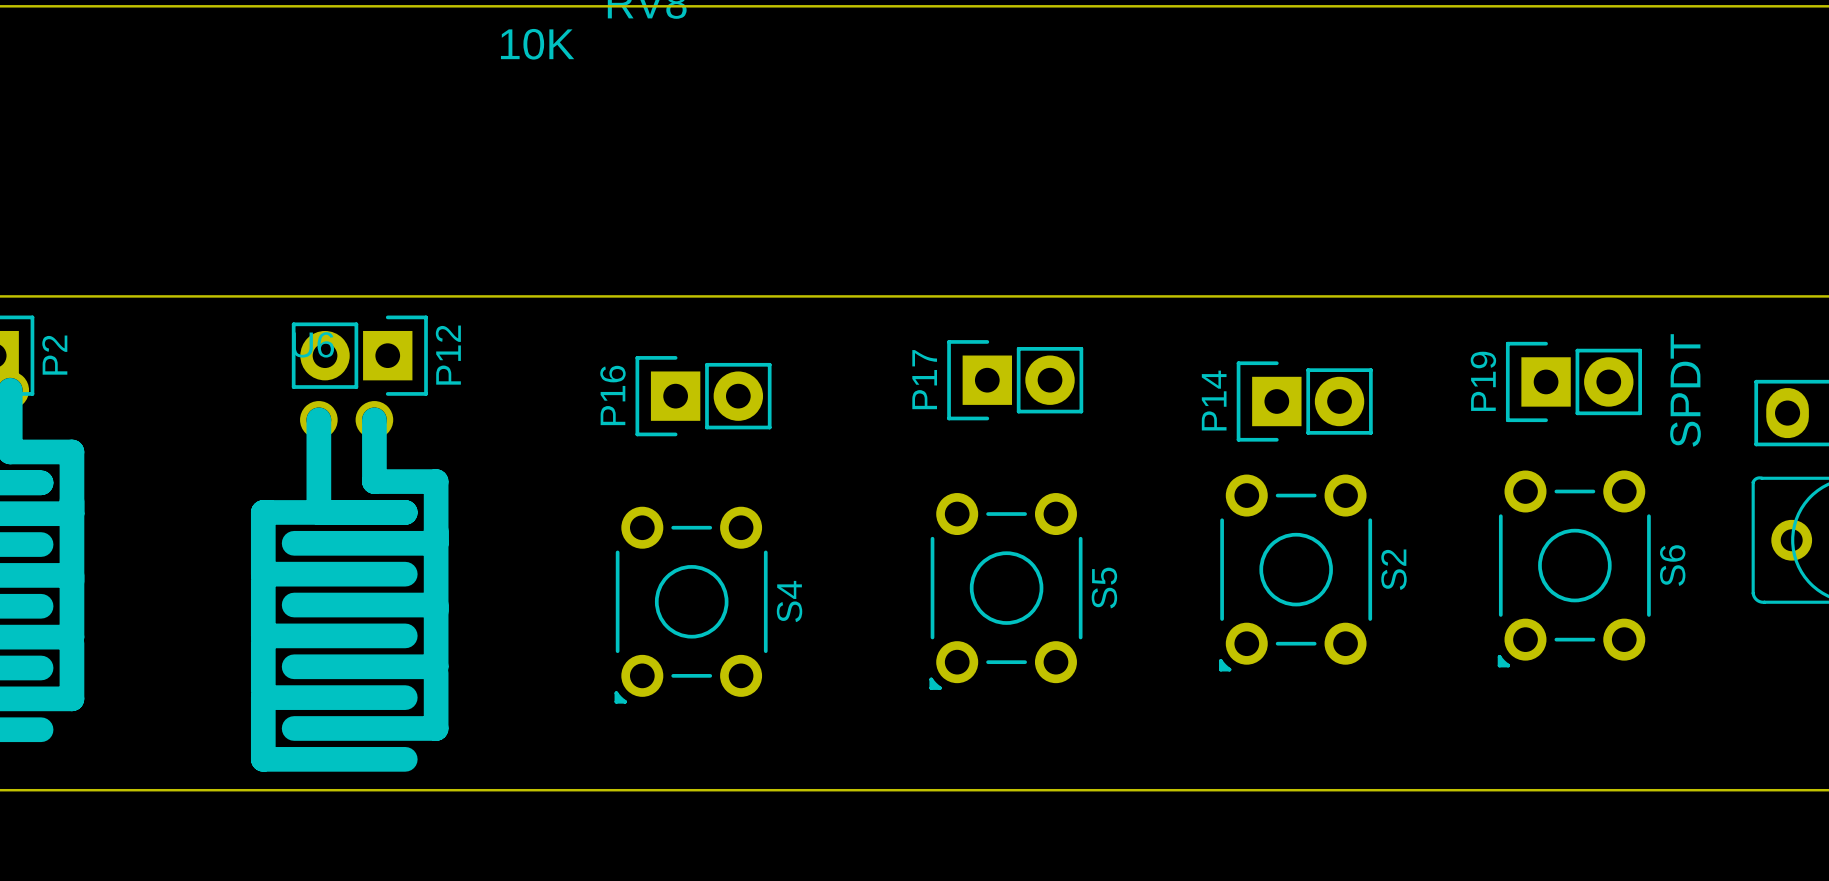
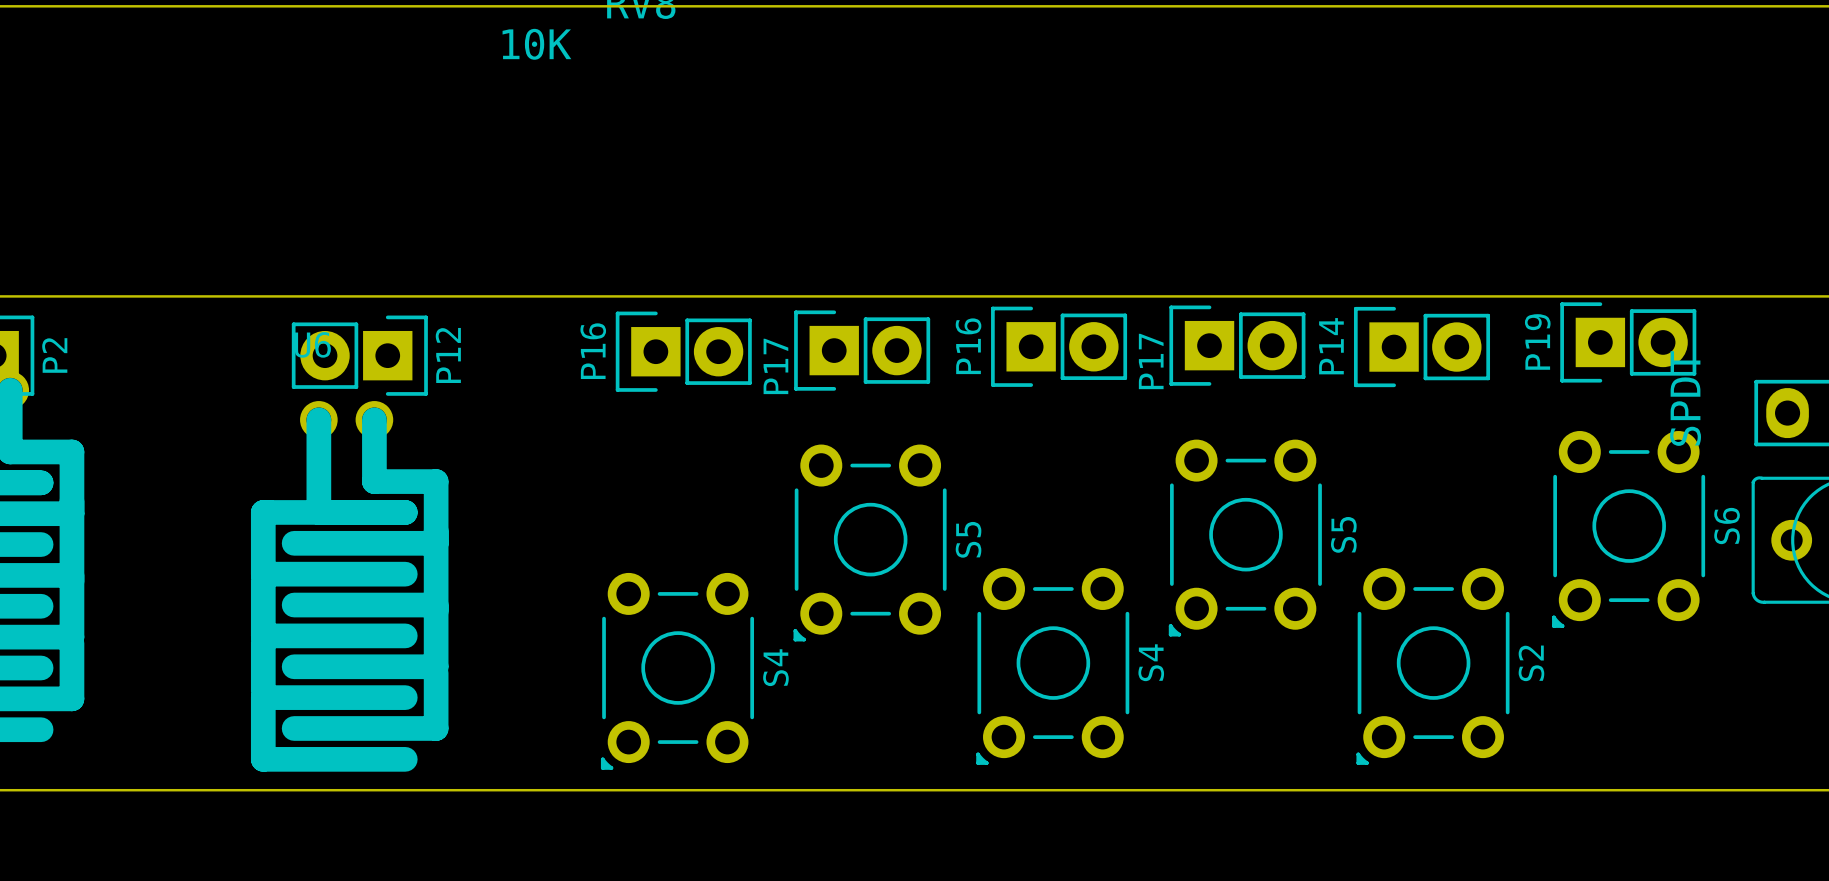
P17: none -> (1237, 345)
P16: none -> (1059, 346)
P17: none -> (862, 350)
P17: (1015, 380) -> none
P19 position: (1573, 381) -> (1628, 342)
P16 position: (703, 396) -> (683, 351)
P14 position: (1304, 401) -> (1421, 347)
S5: none -> (1245, 538)
S5: none -> (870, 543)
S6 position: (1574, 568) -> (1628, 529)
S2 position: (1295, 573) -> (1432, 666)
S5: (1005, 591) -> none
S4 position: (691, 605) -> (677, 671)
S4: none -> (1052, 666)

